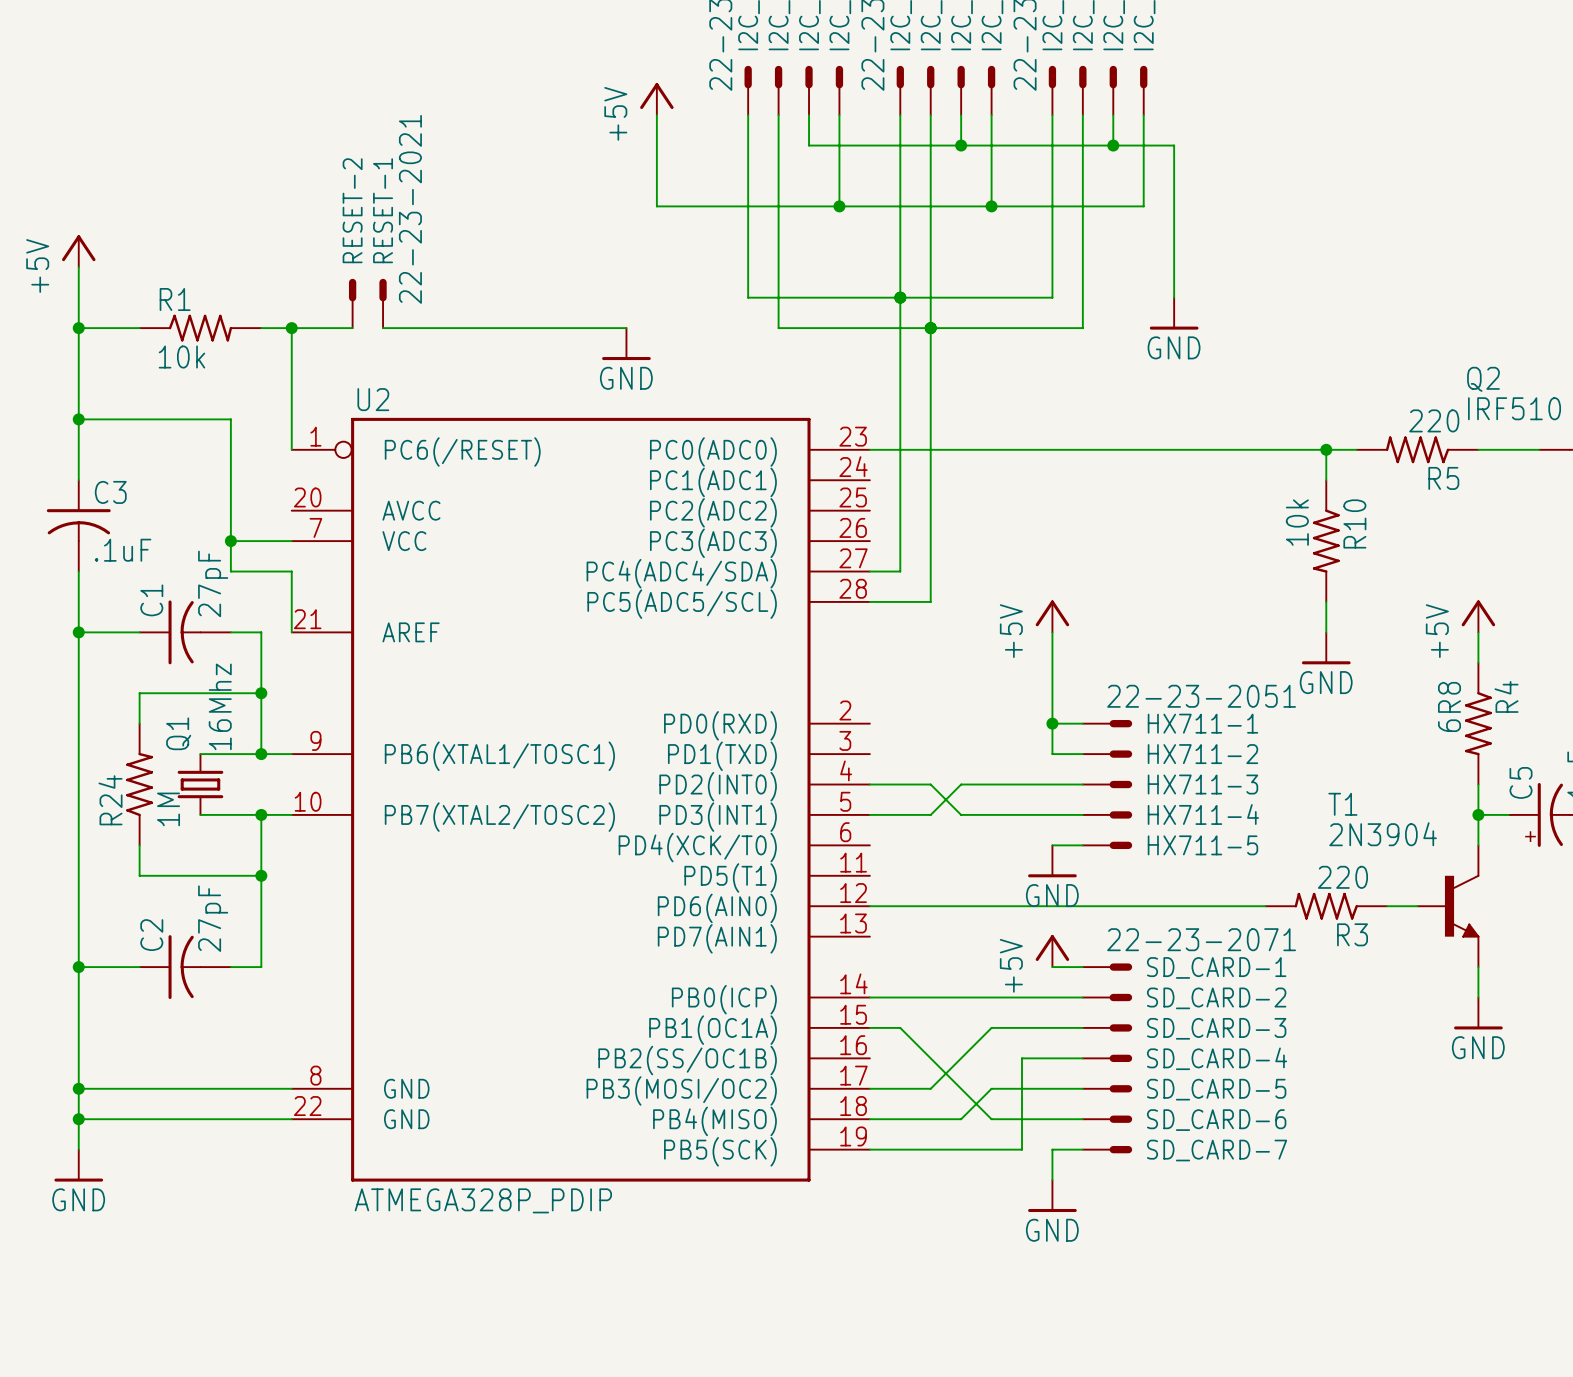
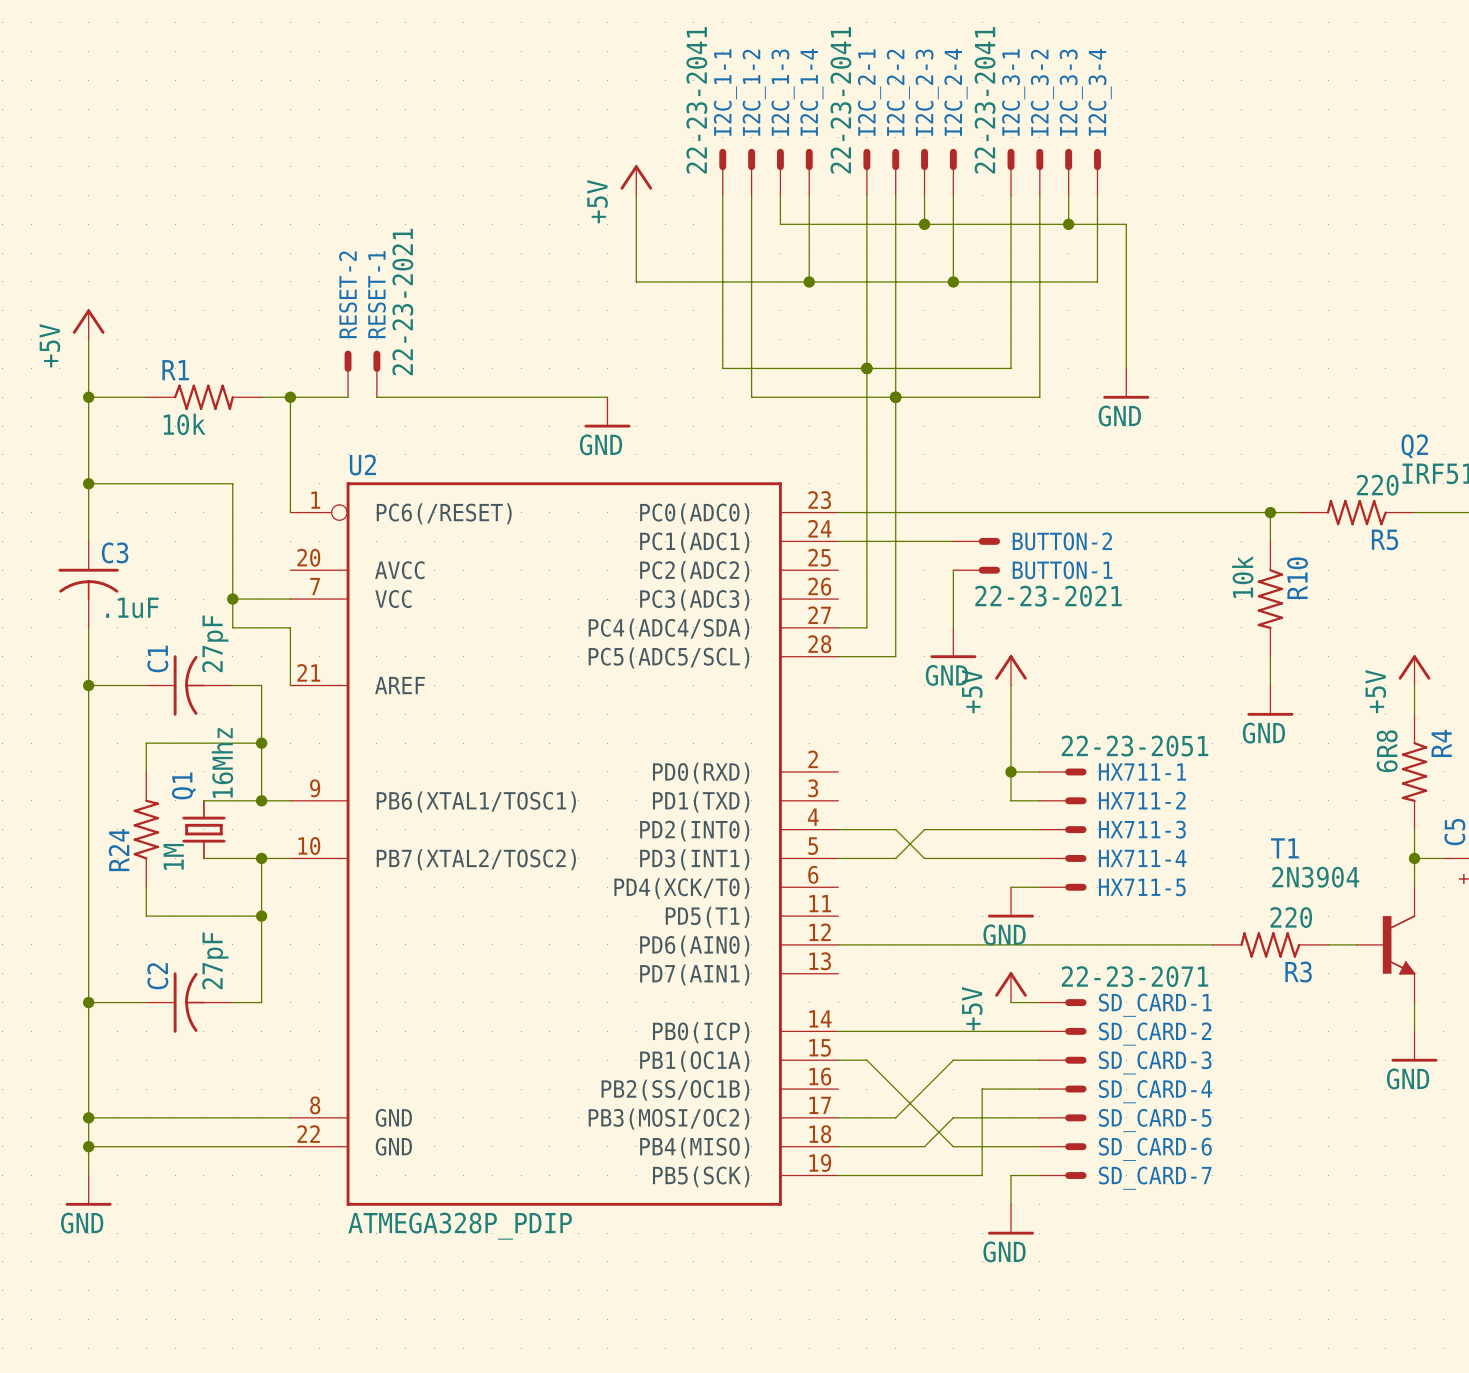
wire: none -> (838, 541) (953, 541)
BUTTON-2: none -> (976, 541)
wire: none -> (953, 570) (953, 627)
BUTTON-1: none -> 22-23-2021 (976, 570)
power symbol: none -> GND (953, 642)

